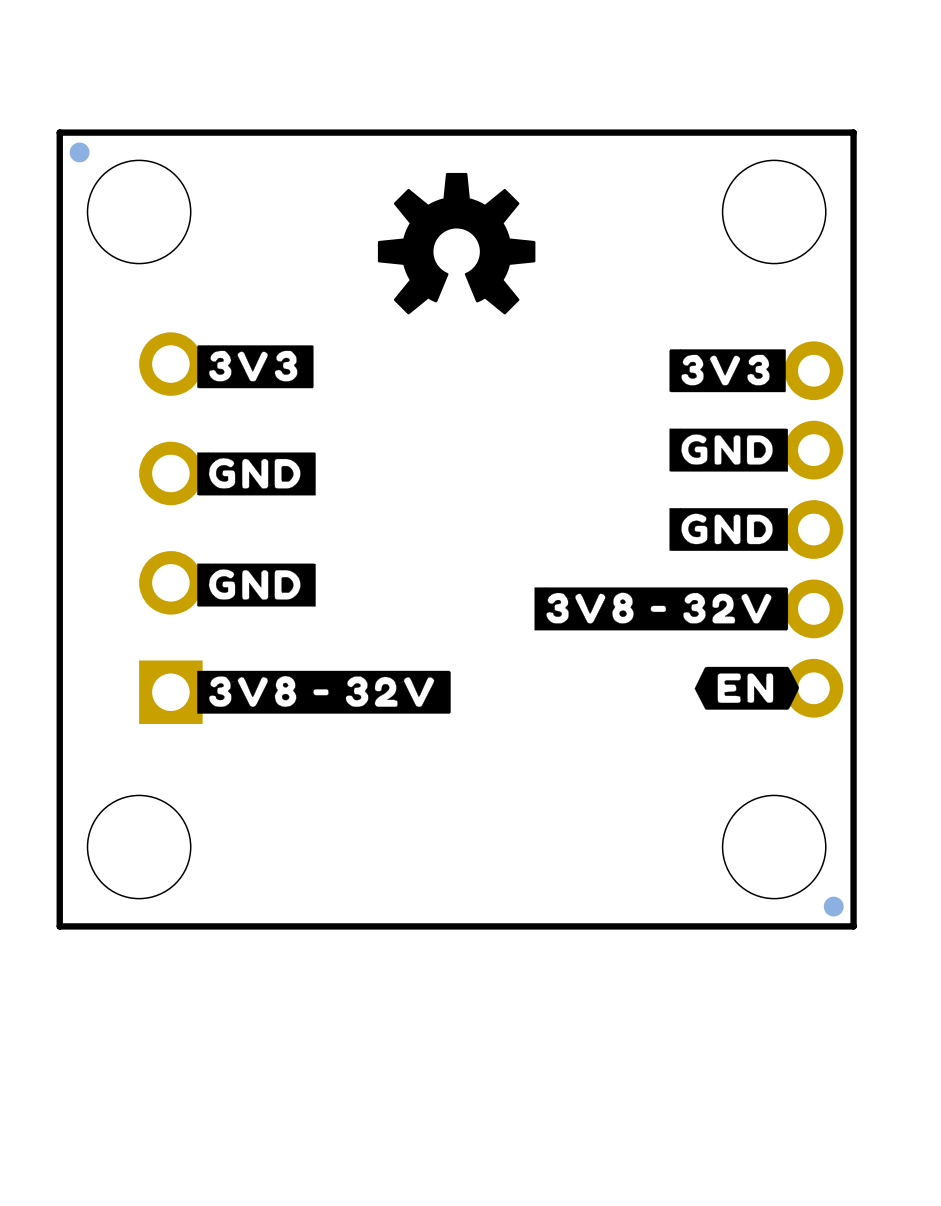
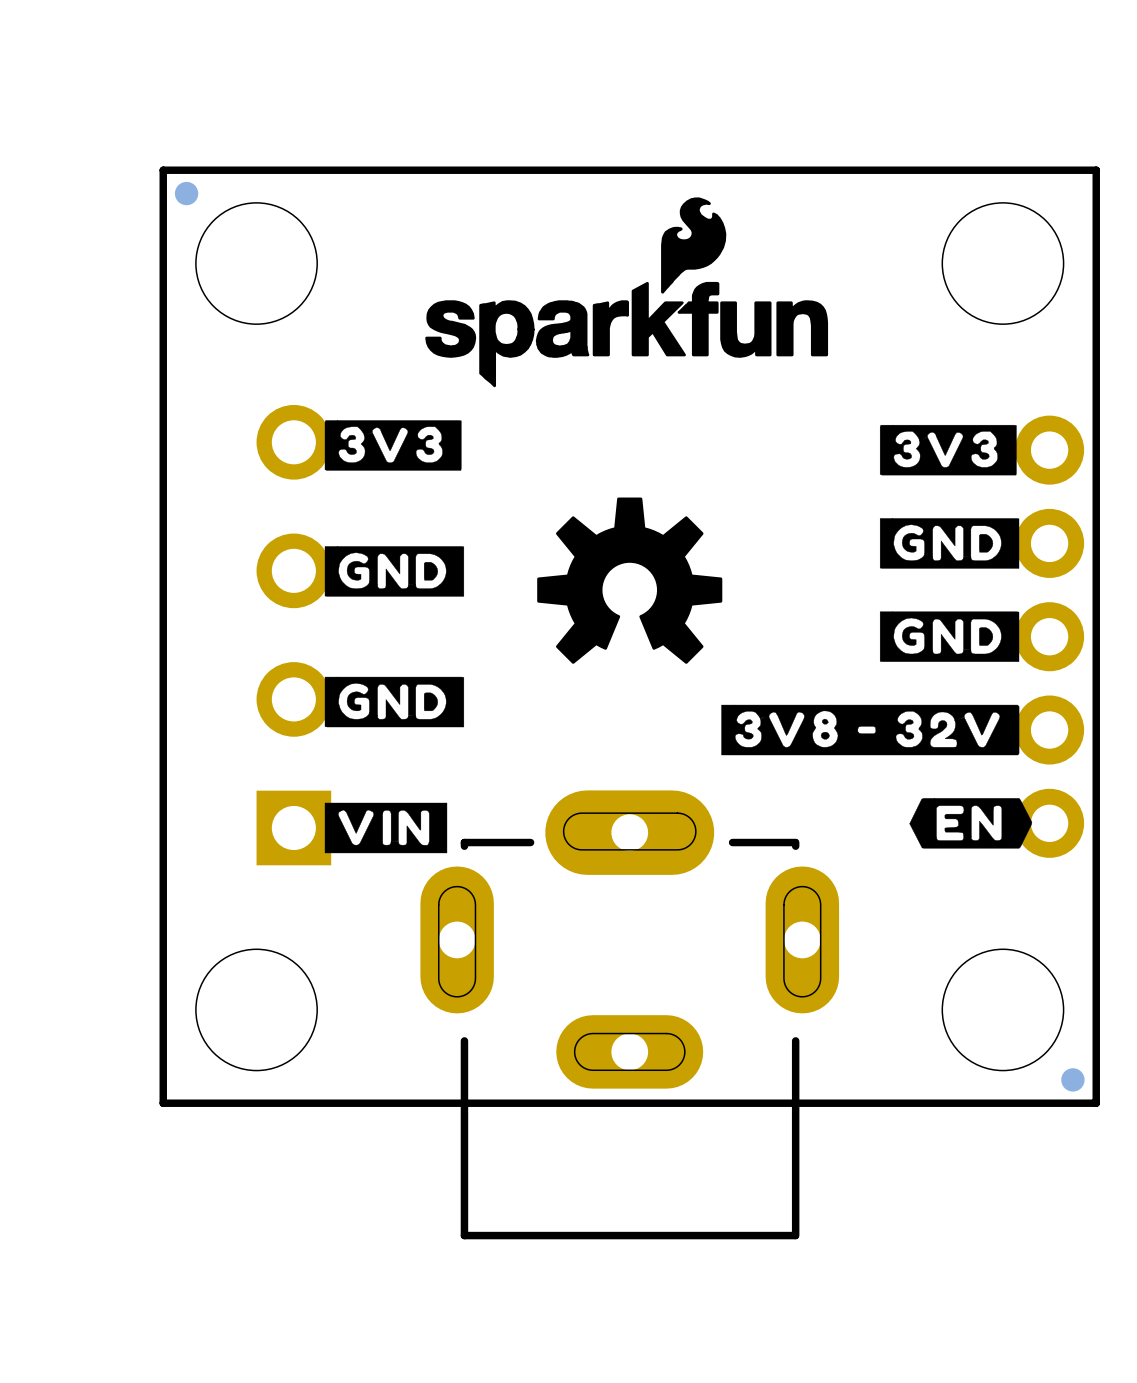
drawing: none -> [425, 197, 829, 388]
drawing position: (456, 243) -> (629, 580)
drawing: [197, 670, 451, 714] -> none
drawing: none -> [324, 802, 448, 854]
part: none -> (629, 1014)

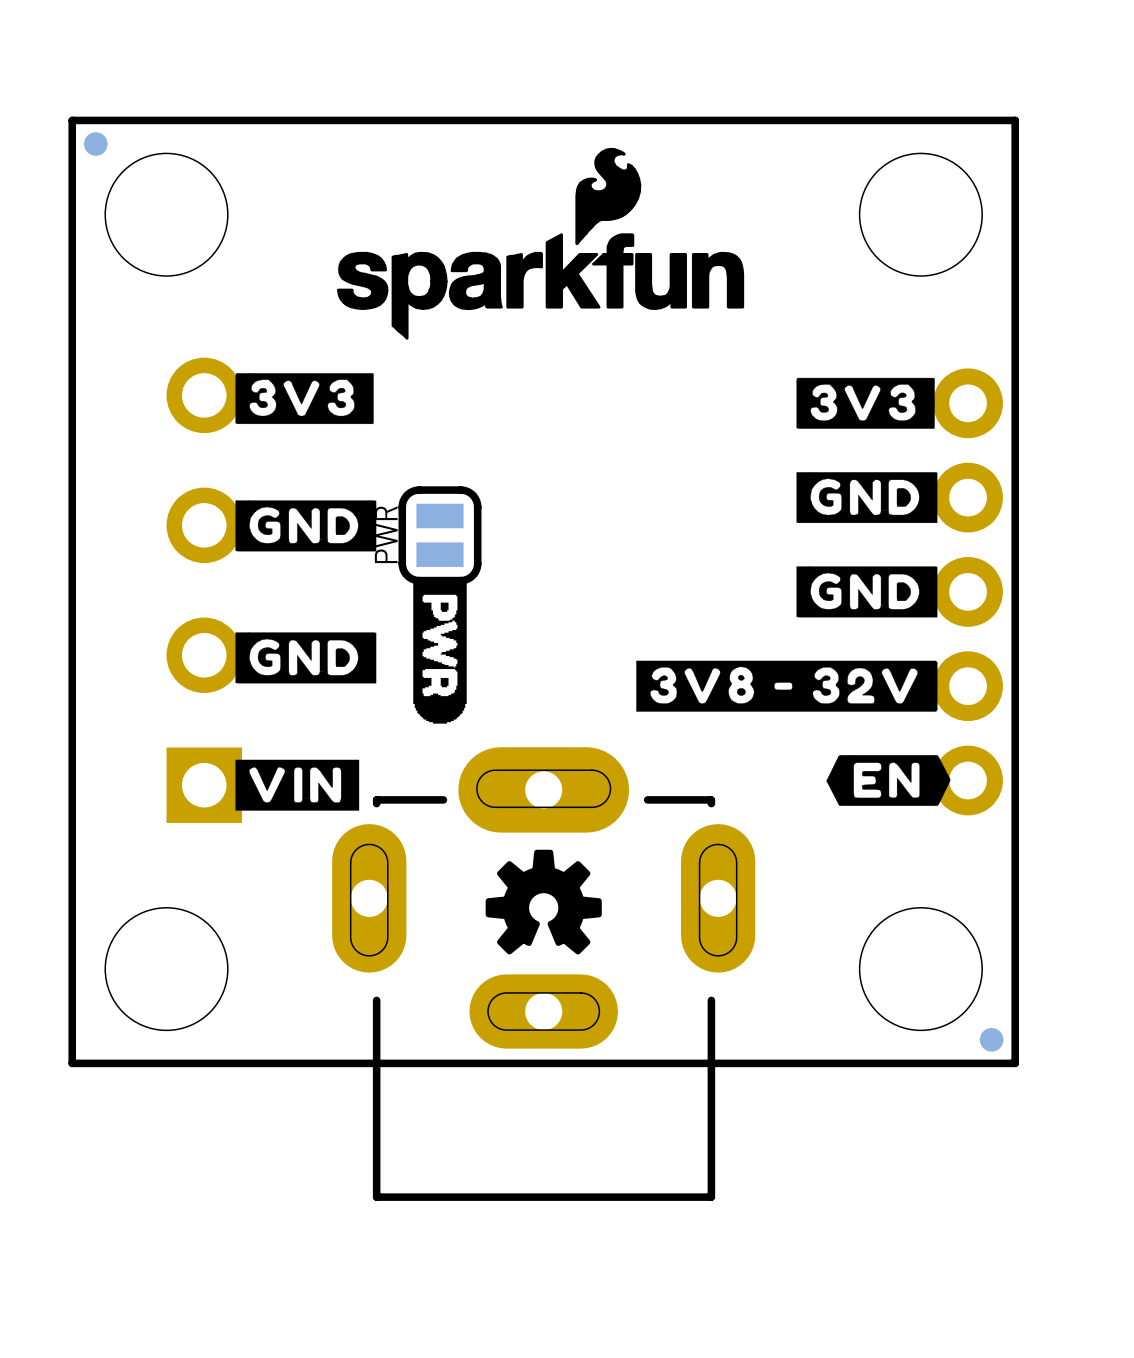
drawing: [537, 497, 723, 664] -> none
PWR: none -> (439, 535)
drawing: none -> [413, 579, 467, 724]
drawing: none -> [485, 849, 602, 955]

